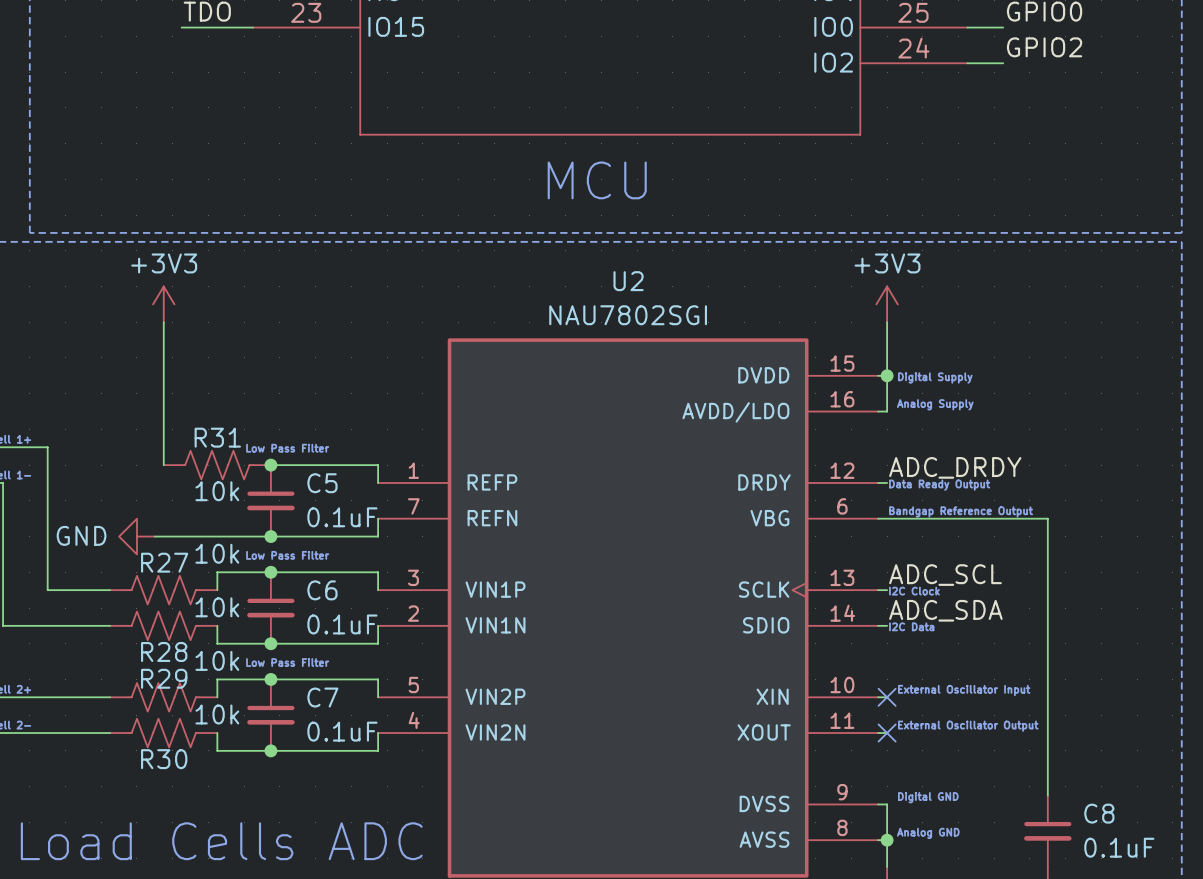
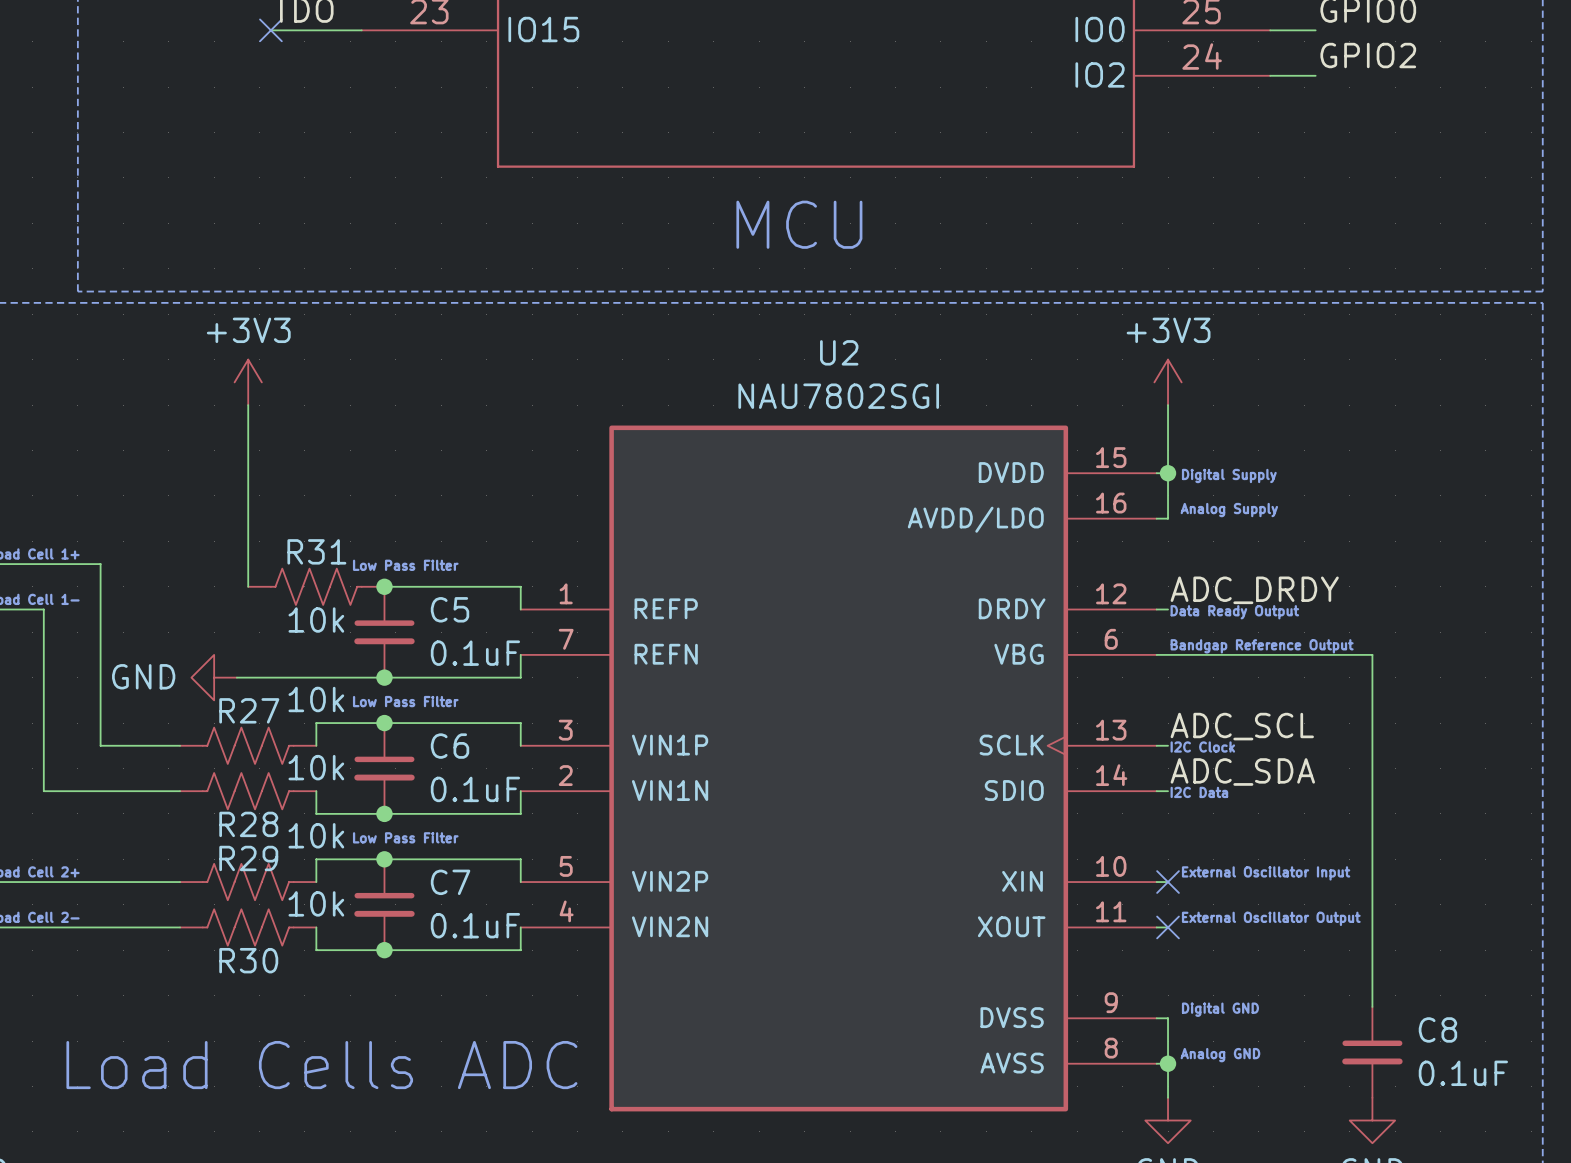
no-connect mark: none -> (270, 30)

